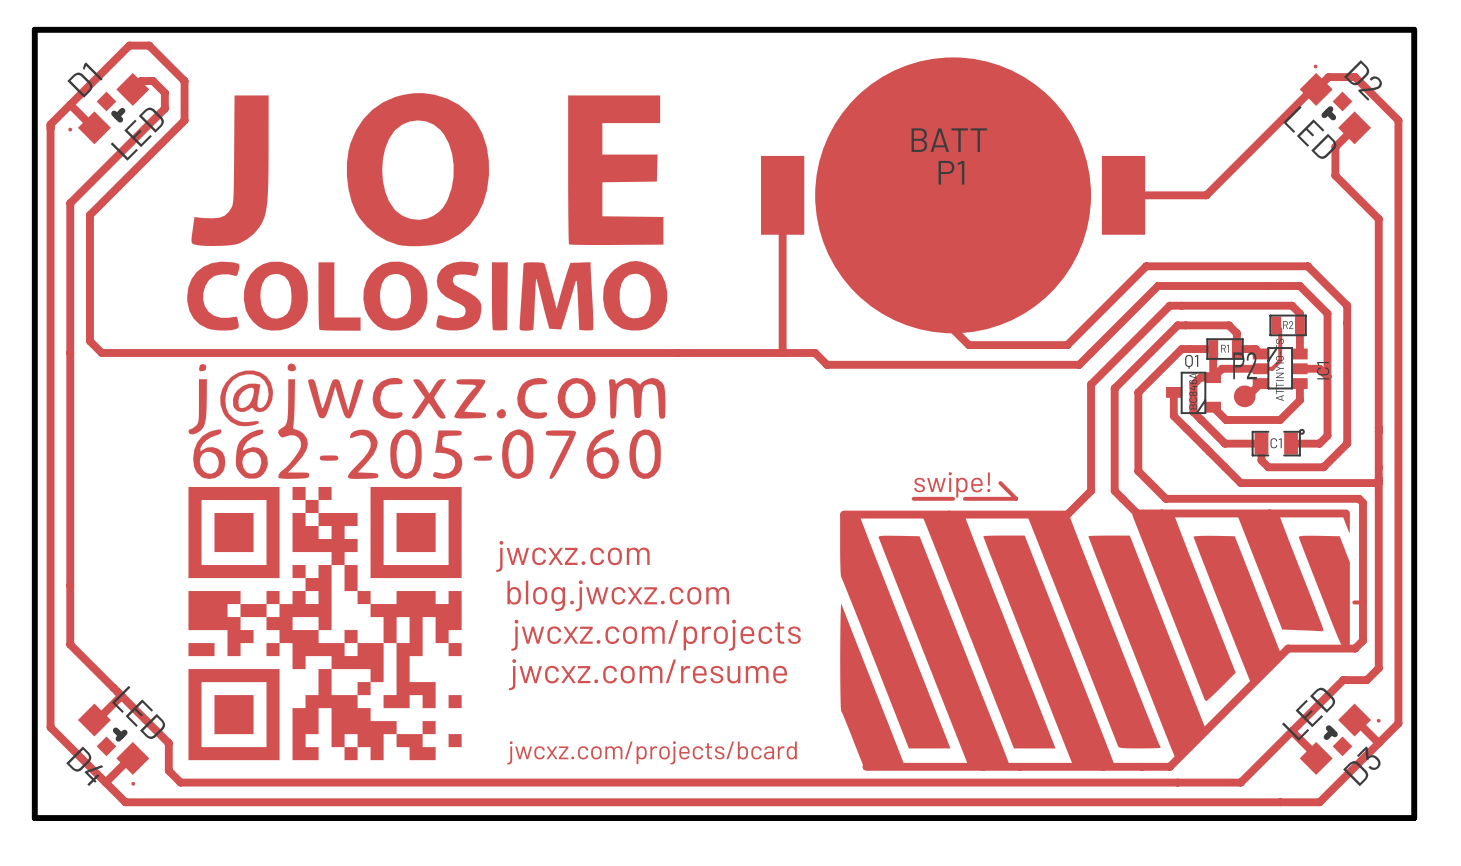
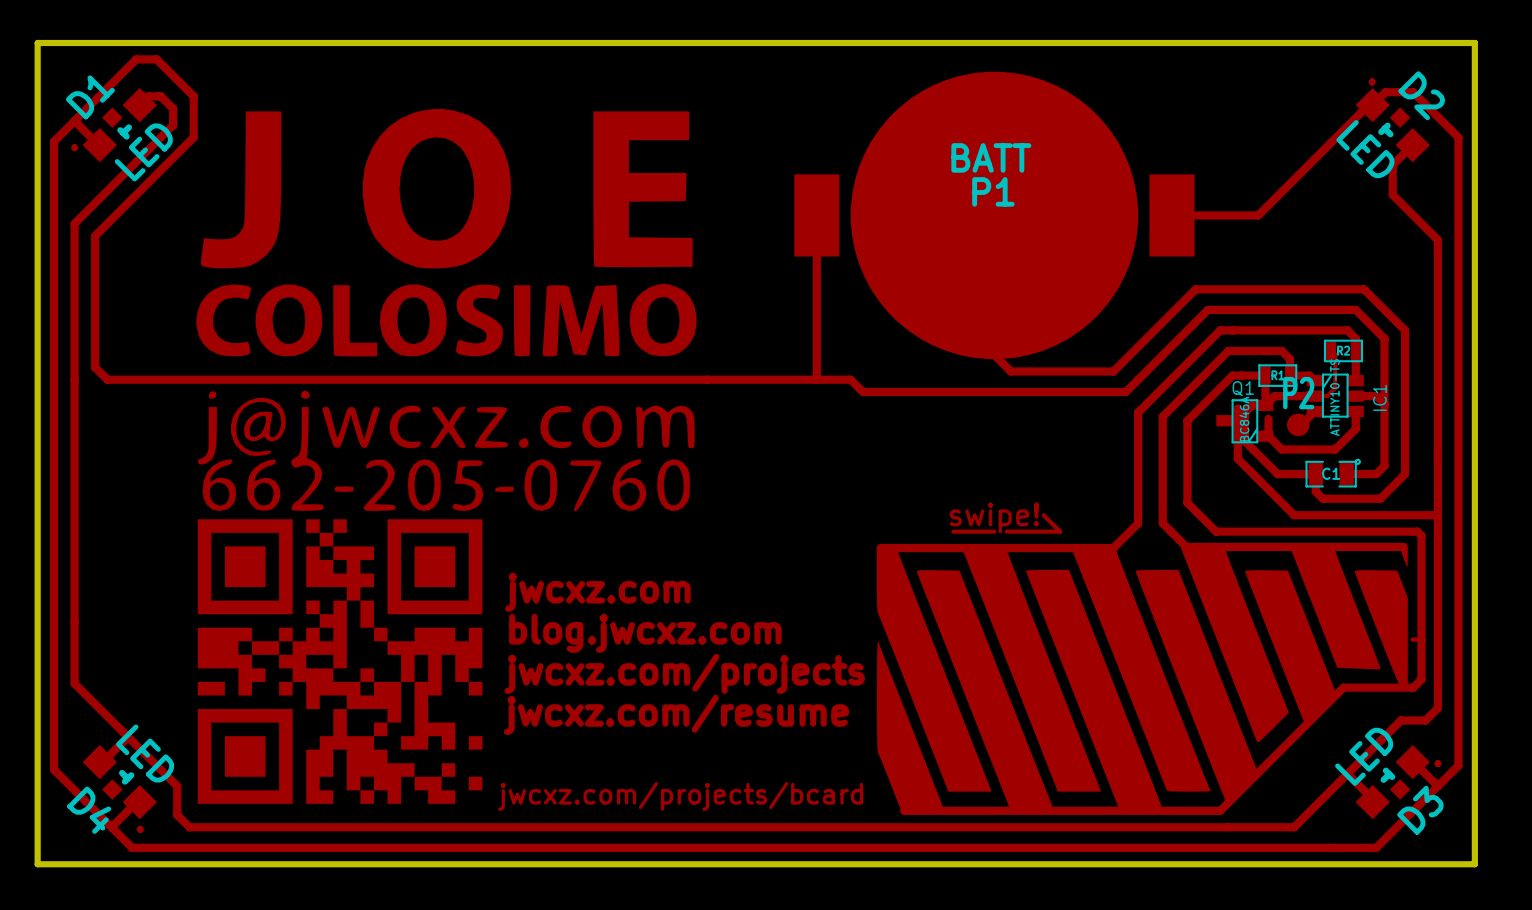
top track: (1173, 392) (1173, 416) (1186, 428) -> (1237, 408) (1237, 458)
top track: (1213, 407) (1226, 419) (1228, 419) -> (1268, 418) (1268, 436) (1281, 449)

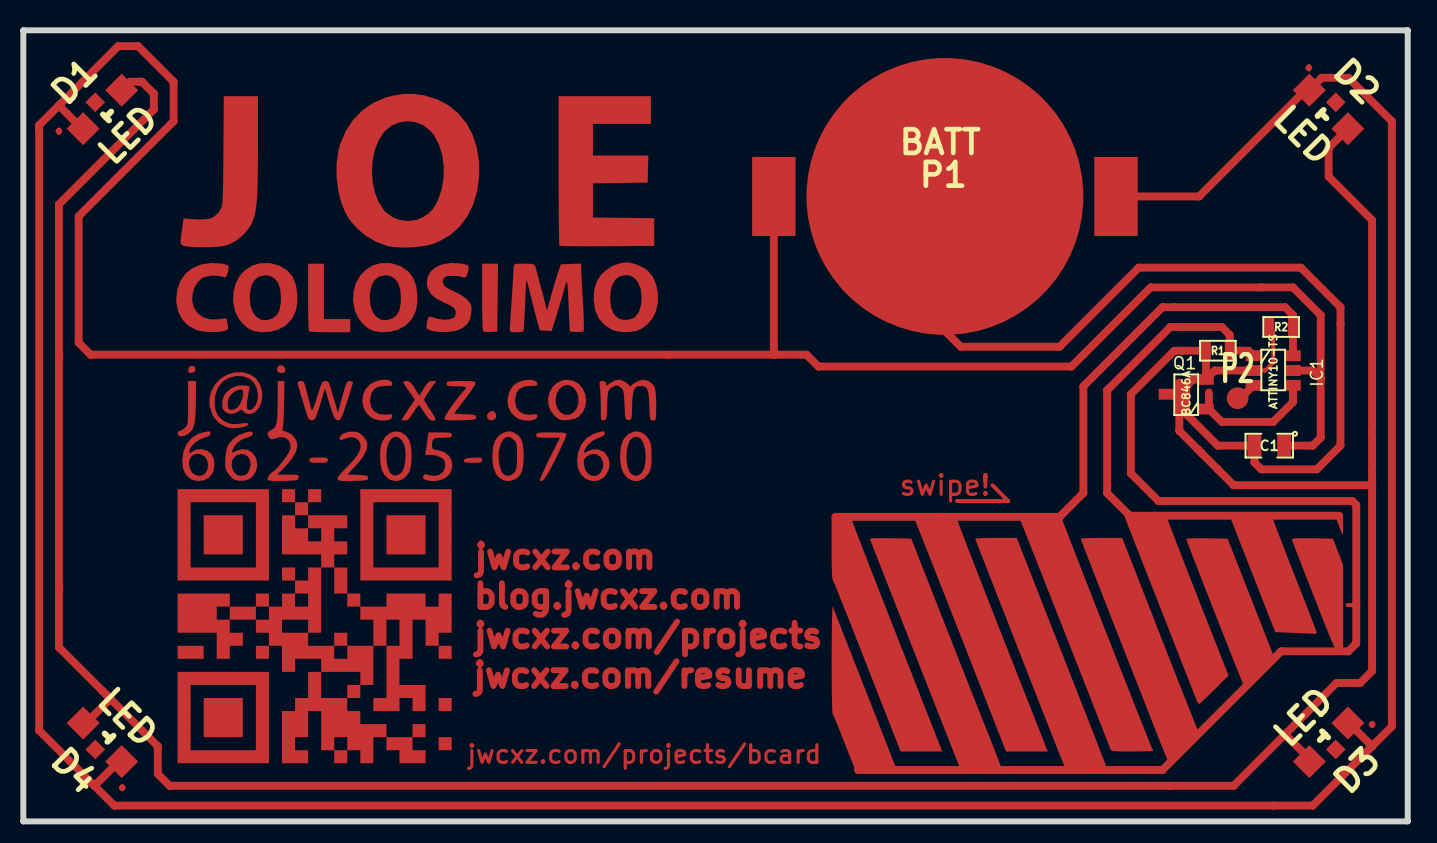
top track: (953, 531) (994, 531) -> none

